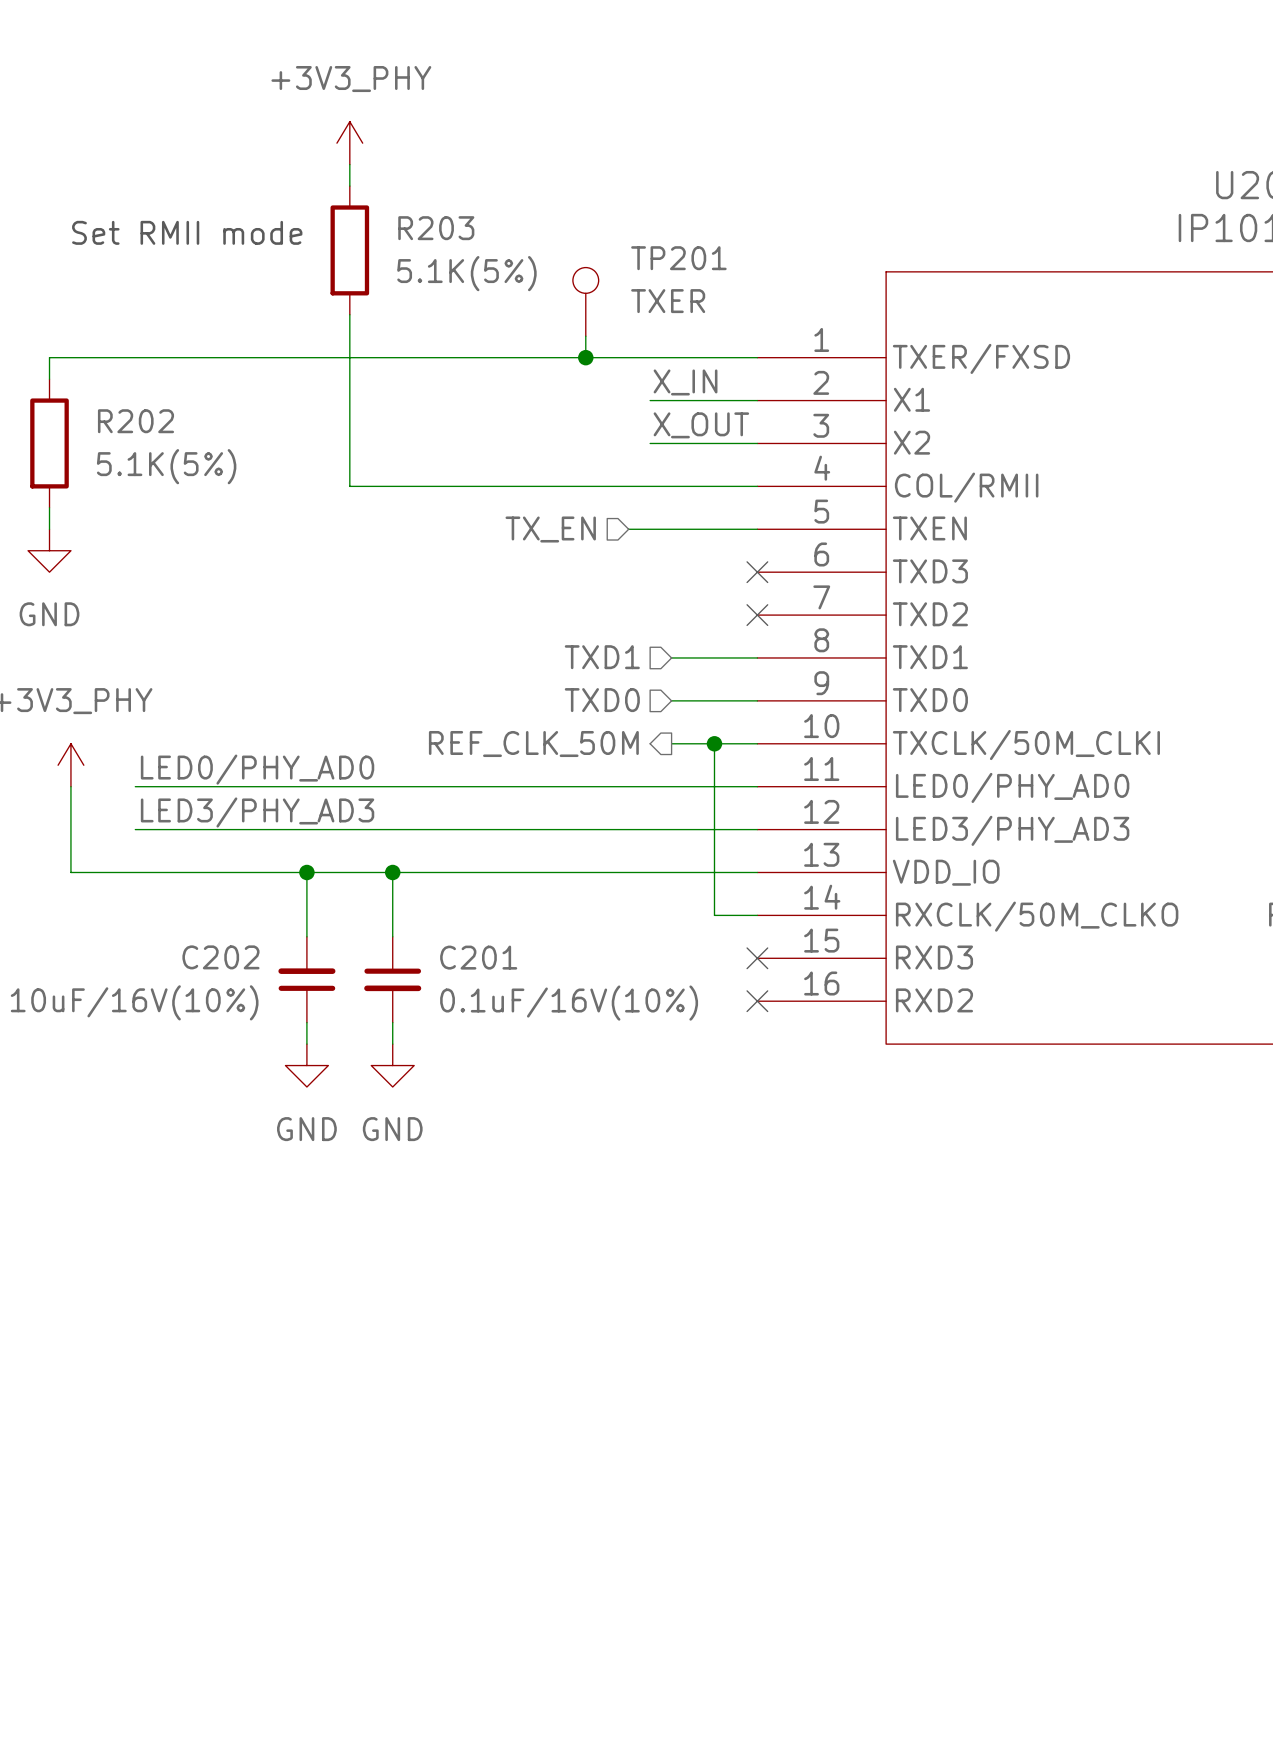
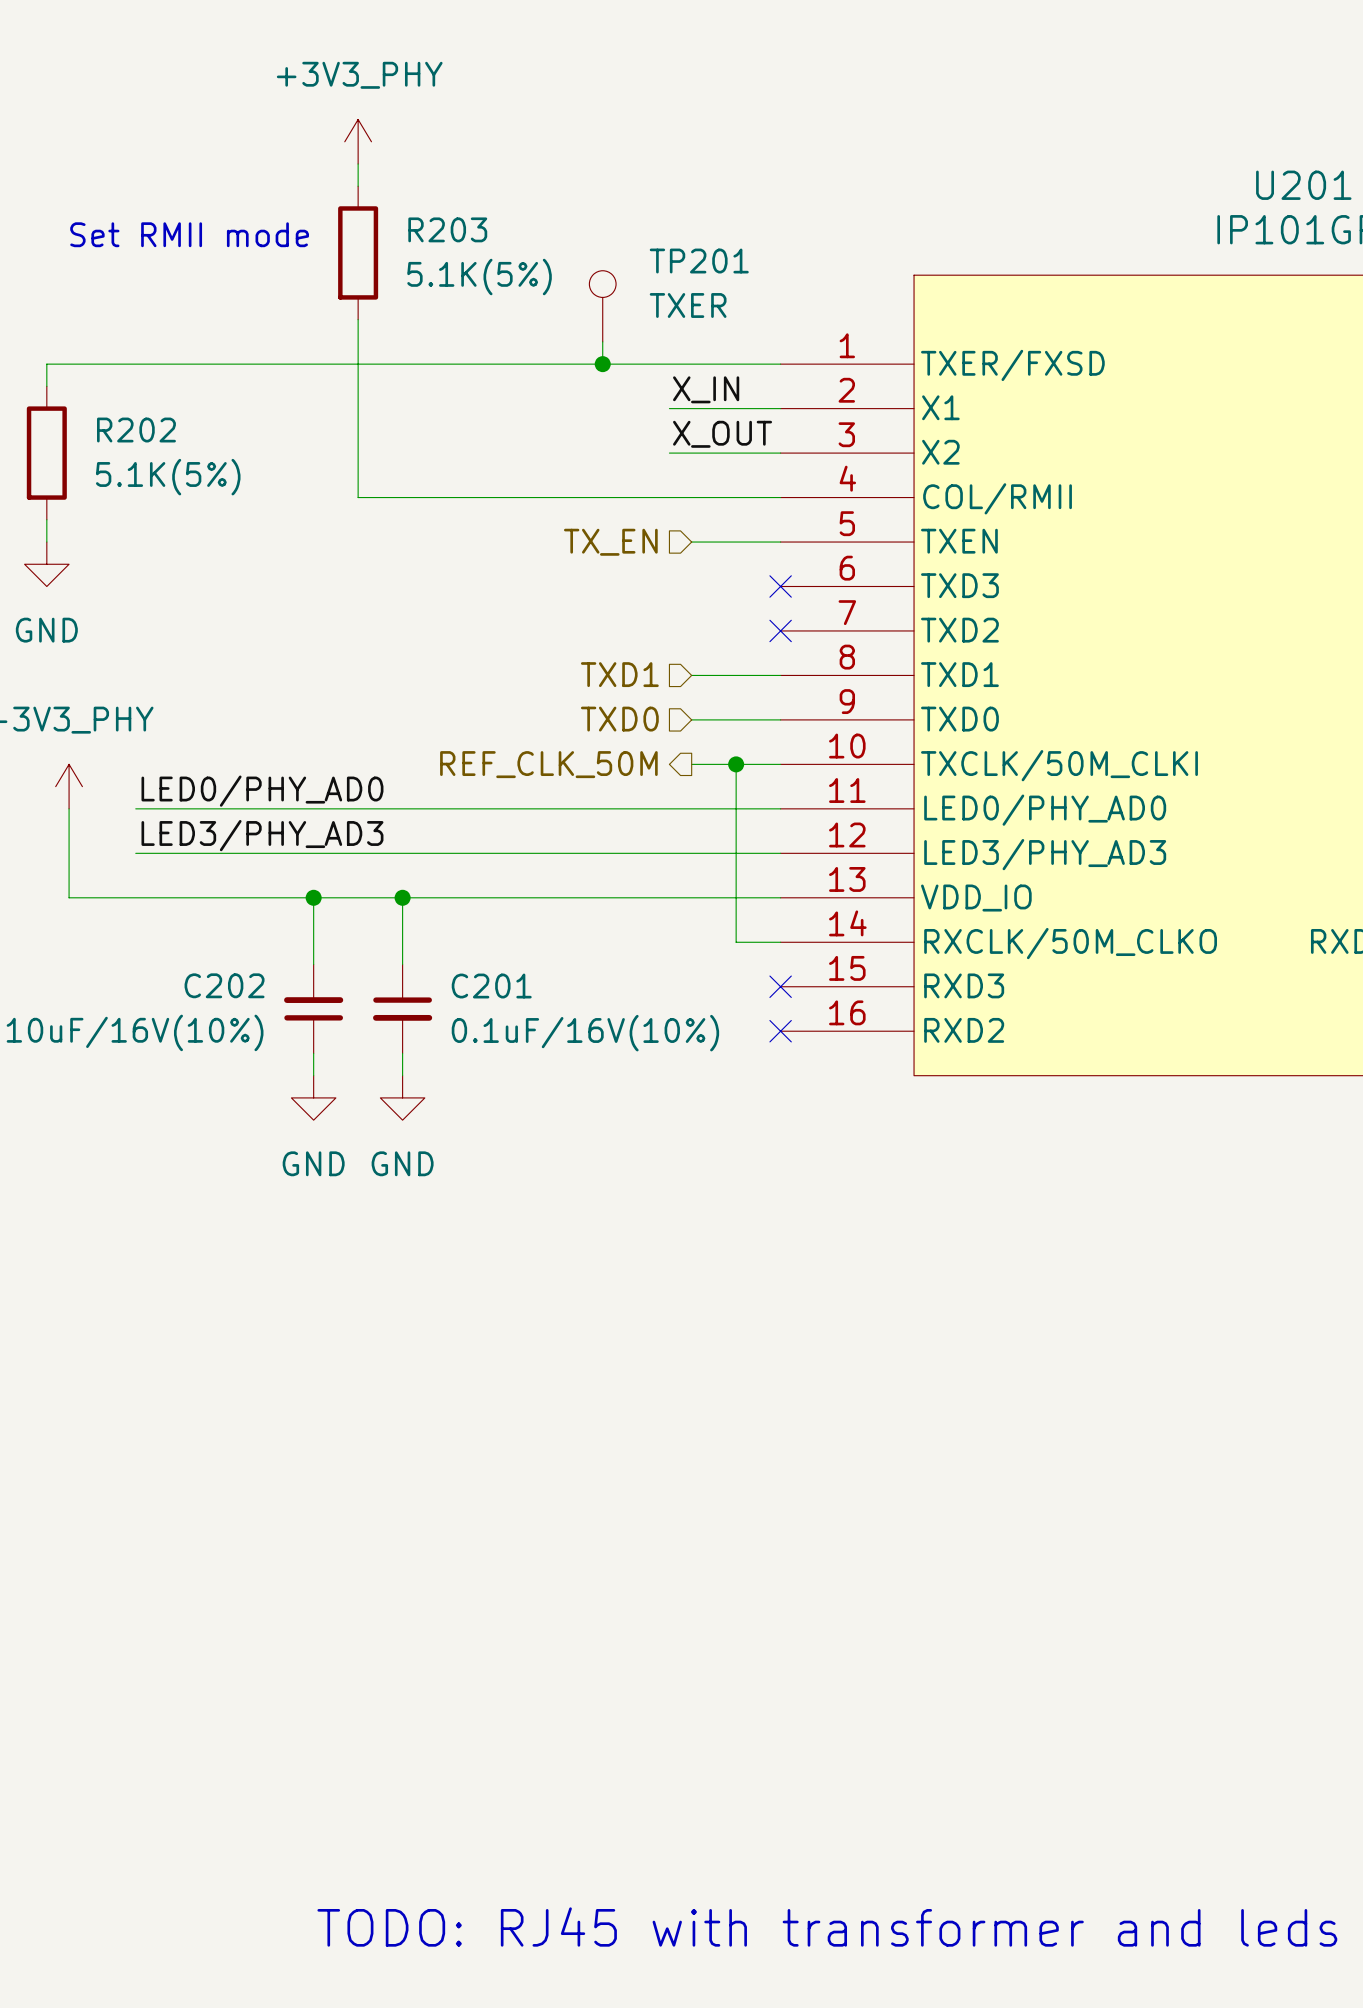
hierarchical label position: TX_EN (550, 529) -> TX_EN (610, 542)
wire: (628, 529) (671, 529) -> none

